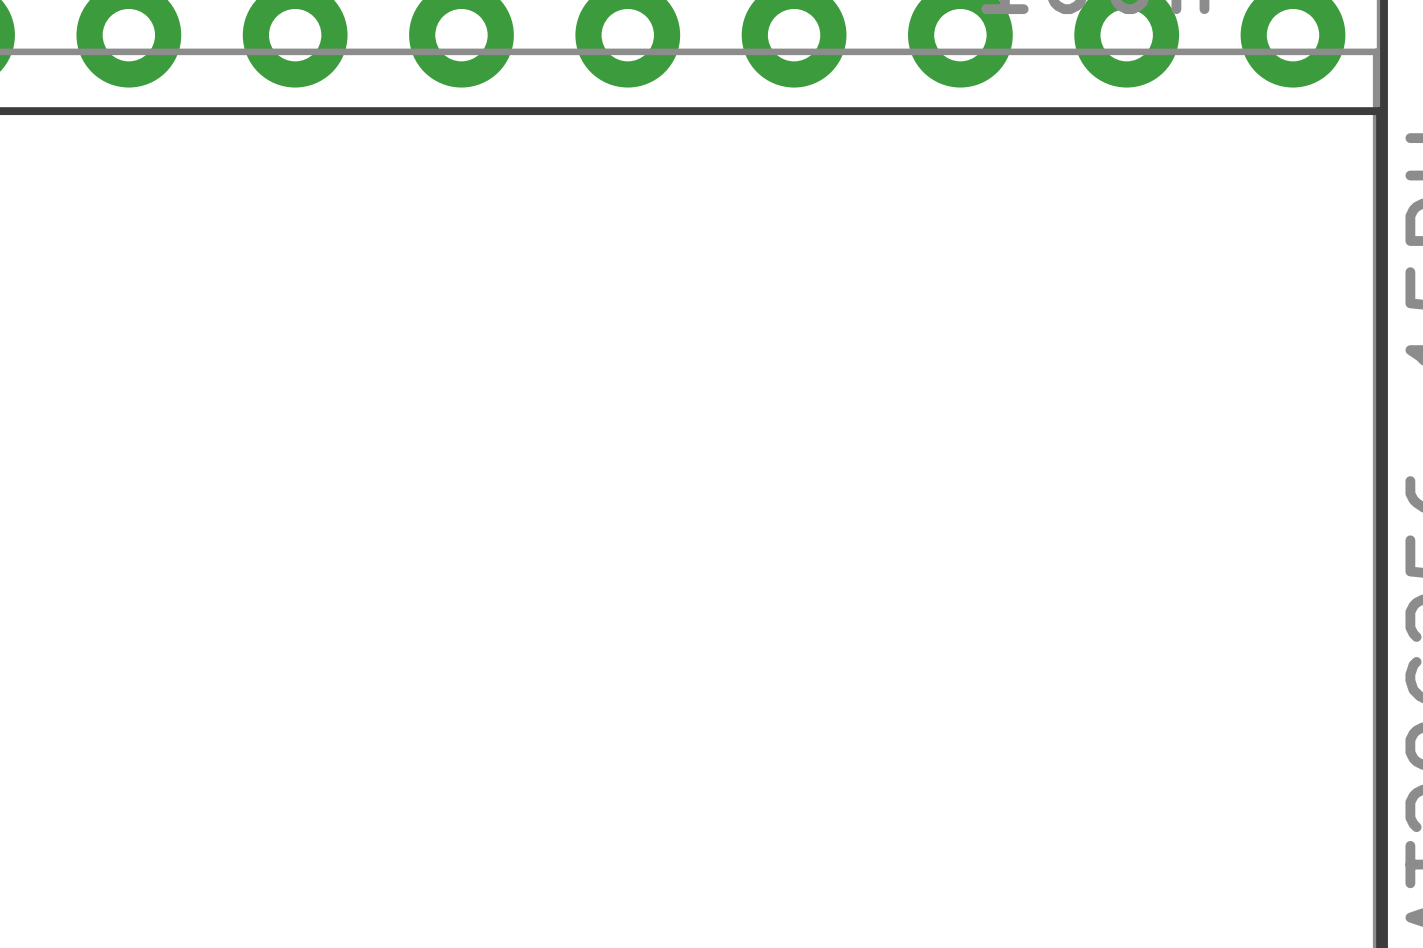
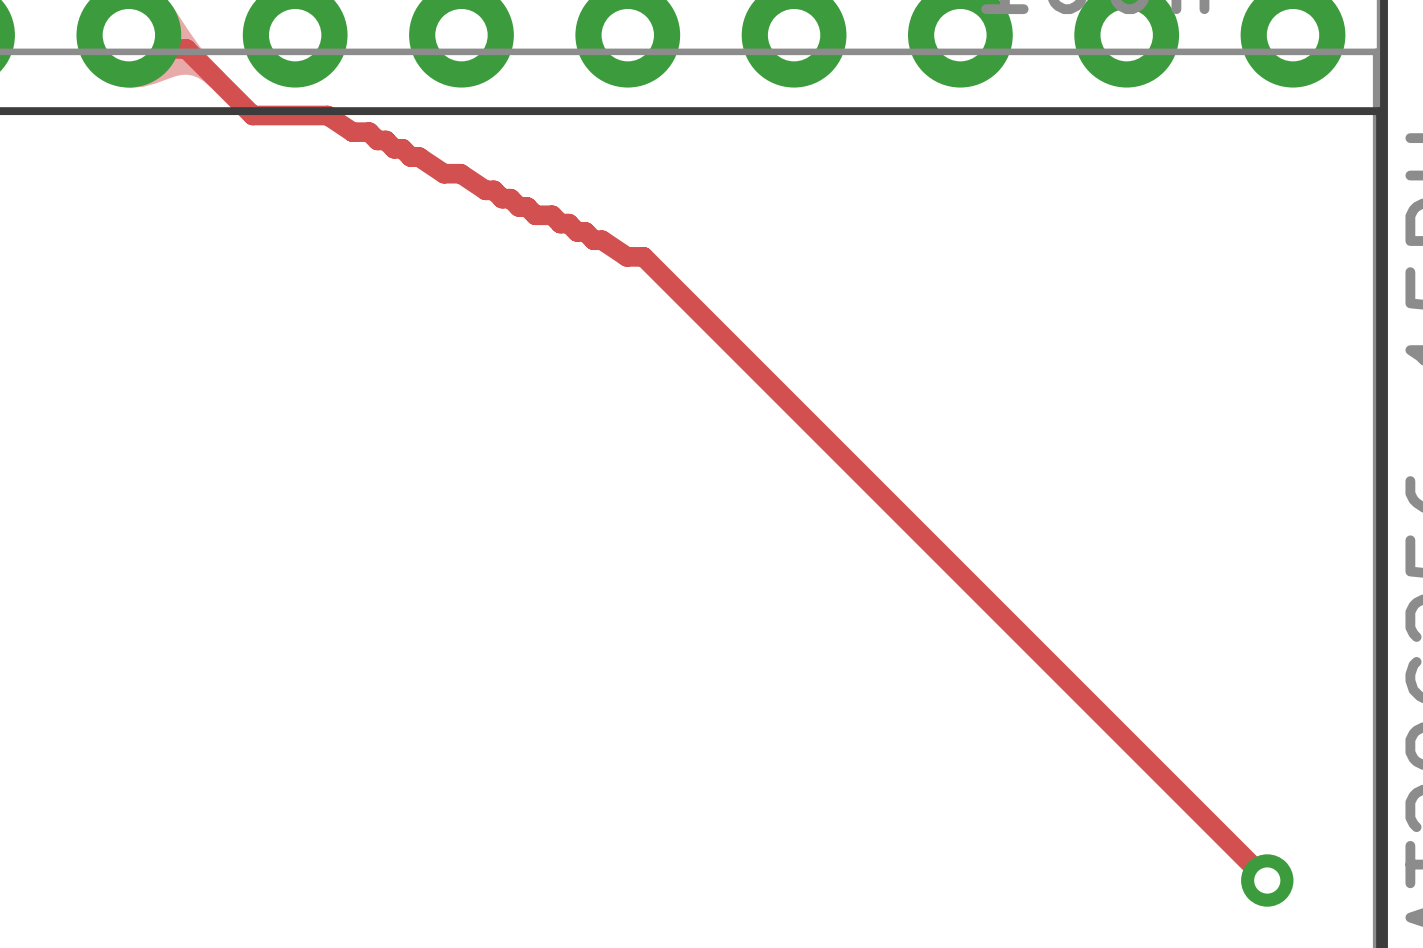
track: none -> (177, 48) (186, 48) (252, 115) (327, 115) (352, 132) (369, 132) (377, 140) (385, 140) (394, 148) (402, 148) (410, 157) (419, 157) (444, 173) (460, 173) (485, 190) (493, 190) (502, 198) (510, 198) (518, 206) (527, 206) (535, 215) (552, 215) (560, 223) (568, 223) (577, 231) (585, 231) (593, 240) (602, 240) (626, 256) (643, 256) (1267, 880)
via: none -> (1267, 880)

